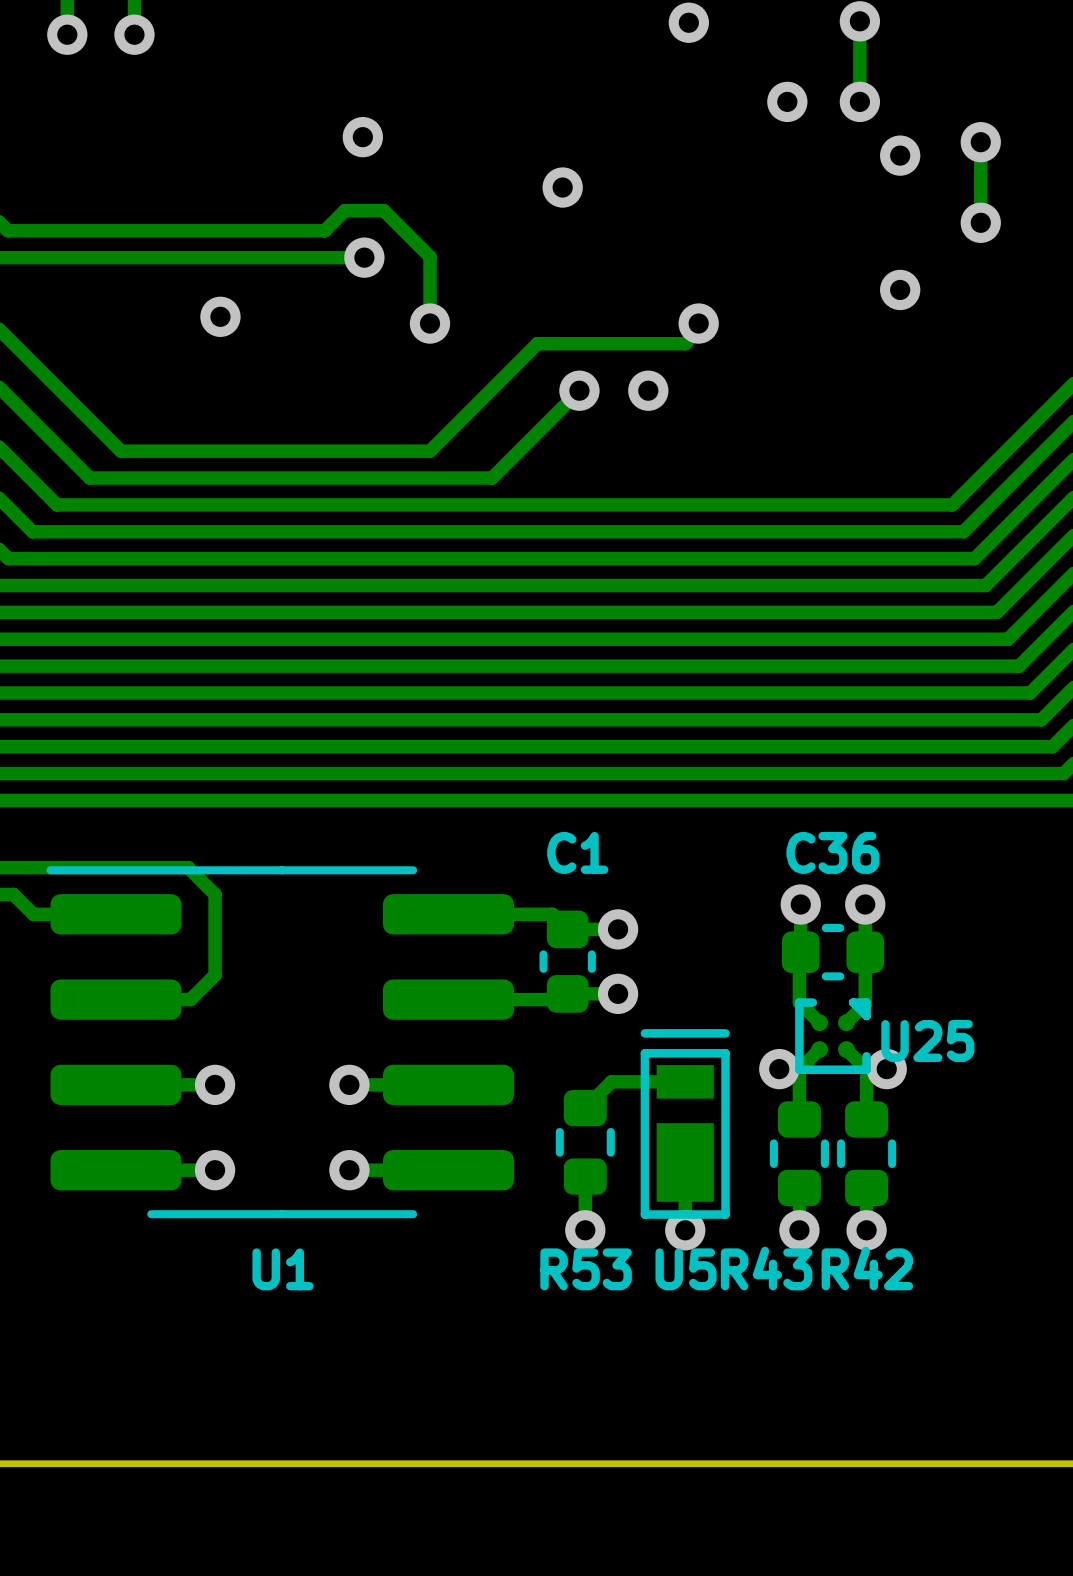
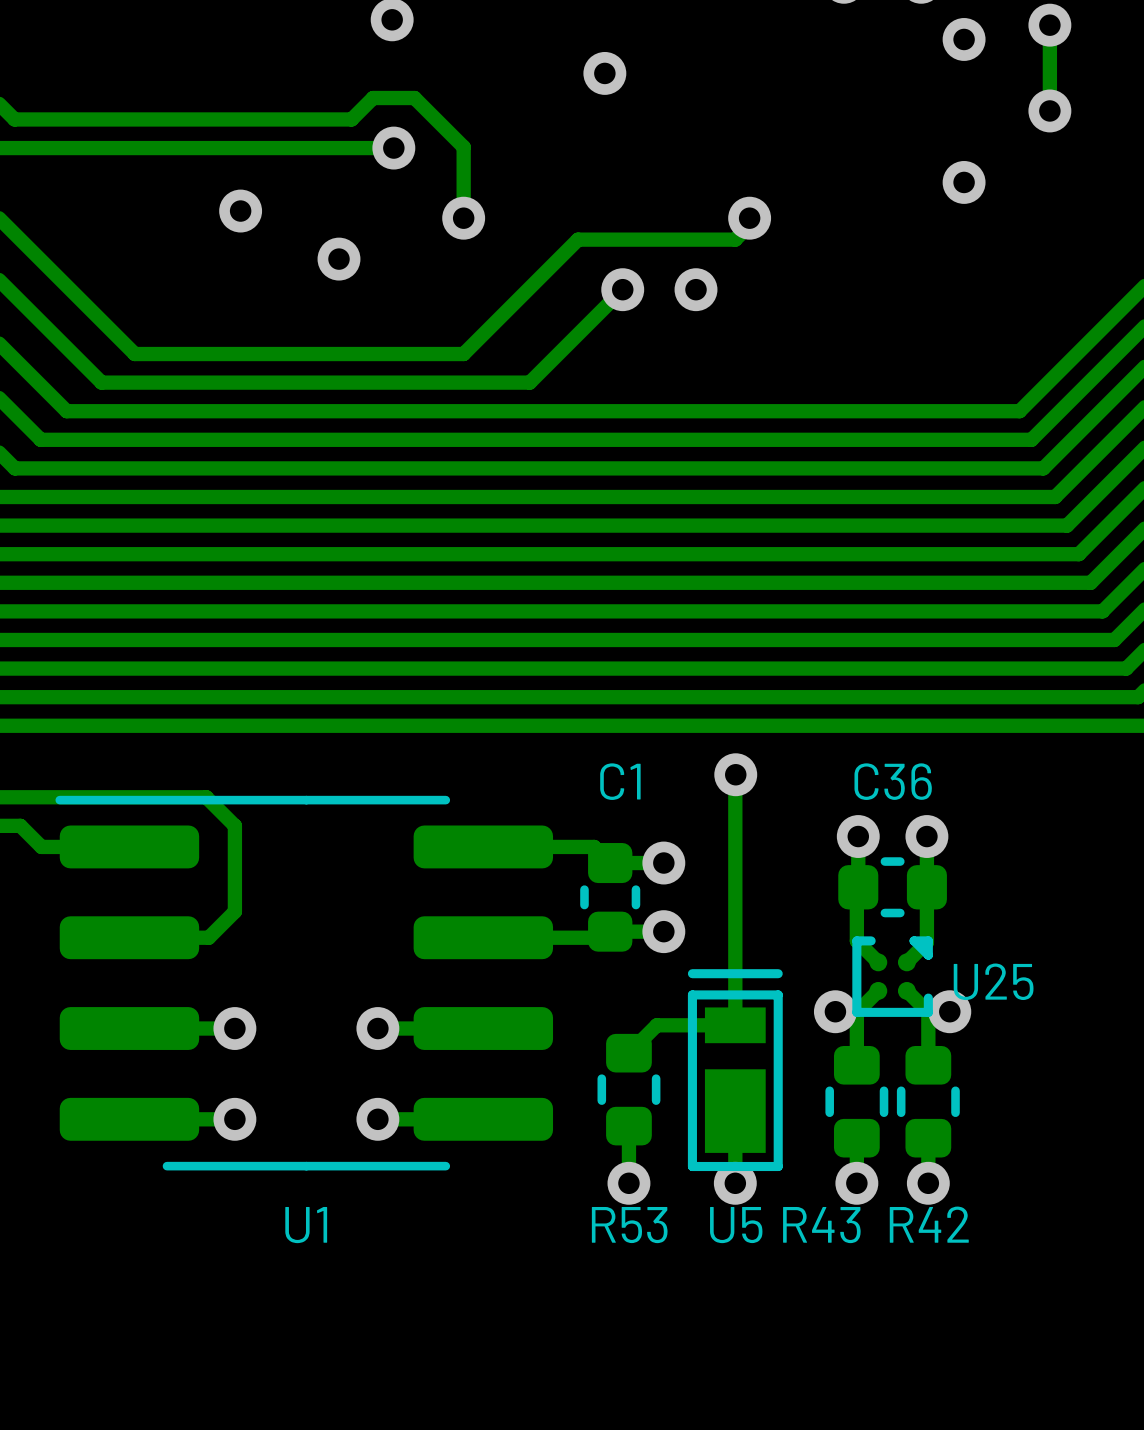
via: none -> (338, 259)
track: none -> (735, 775) (735, 1025)
via: none -> (735, 774)

